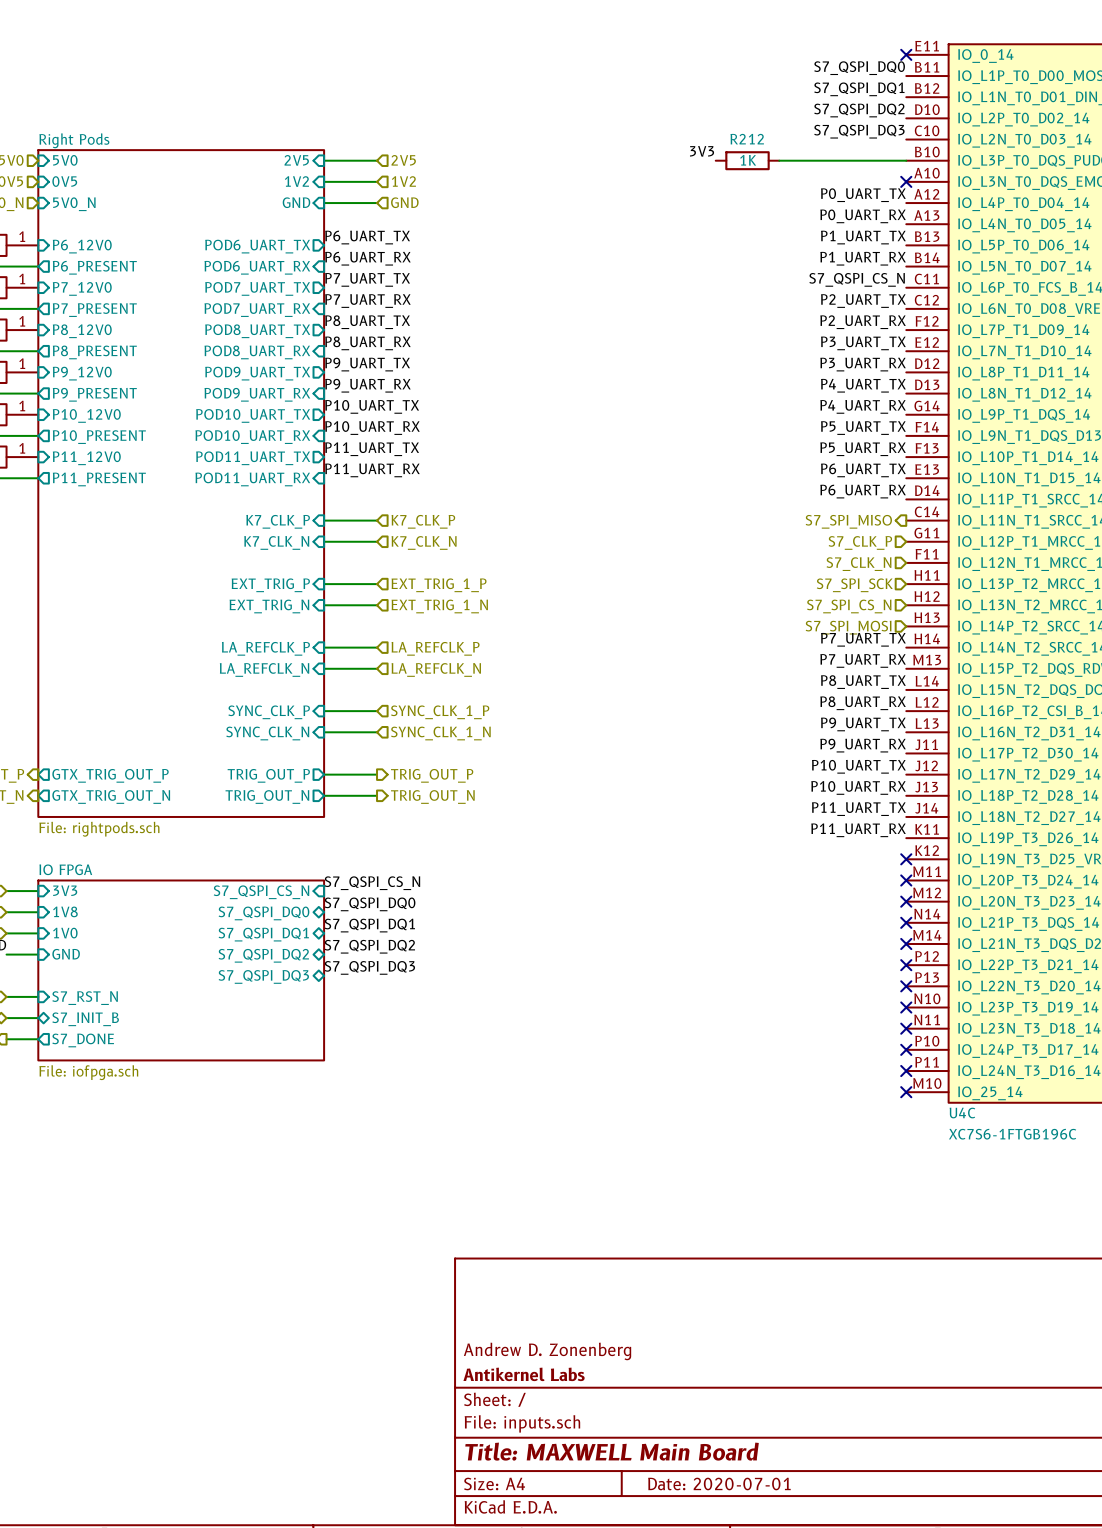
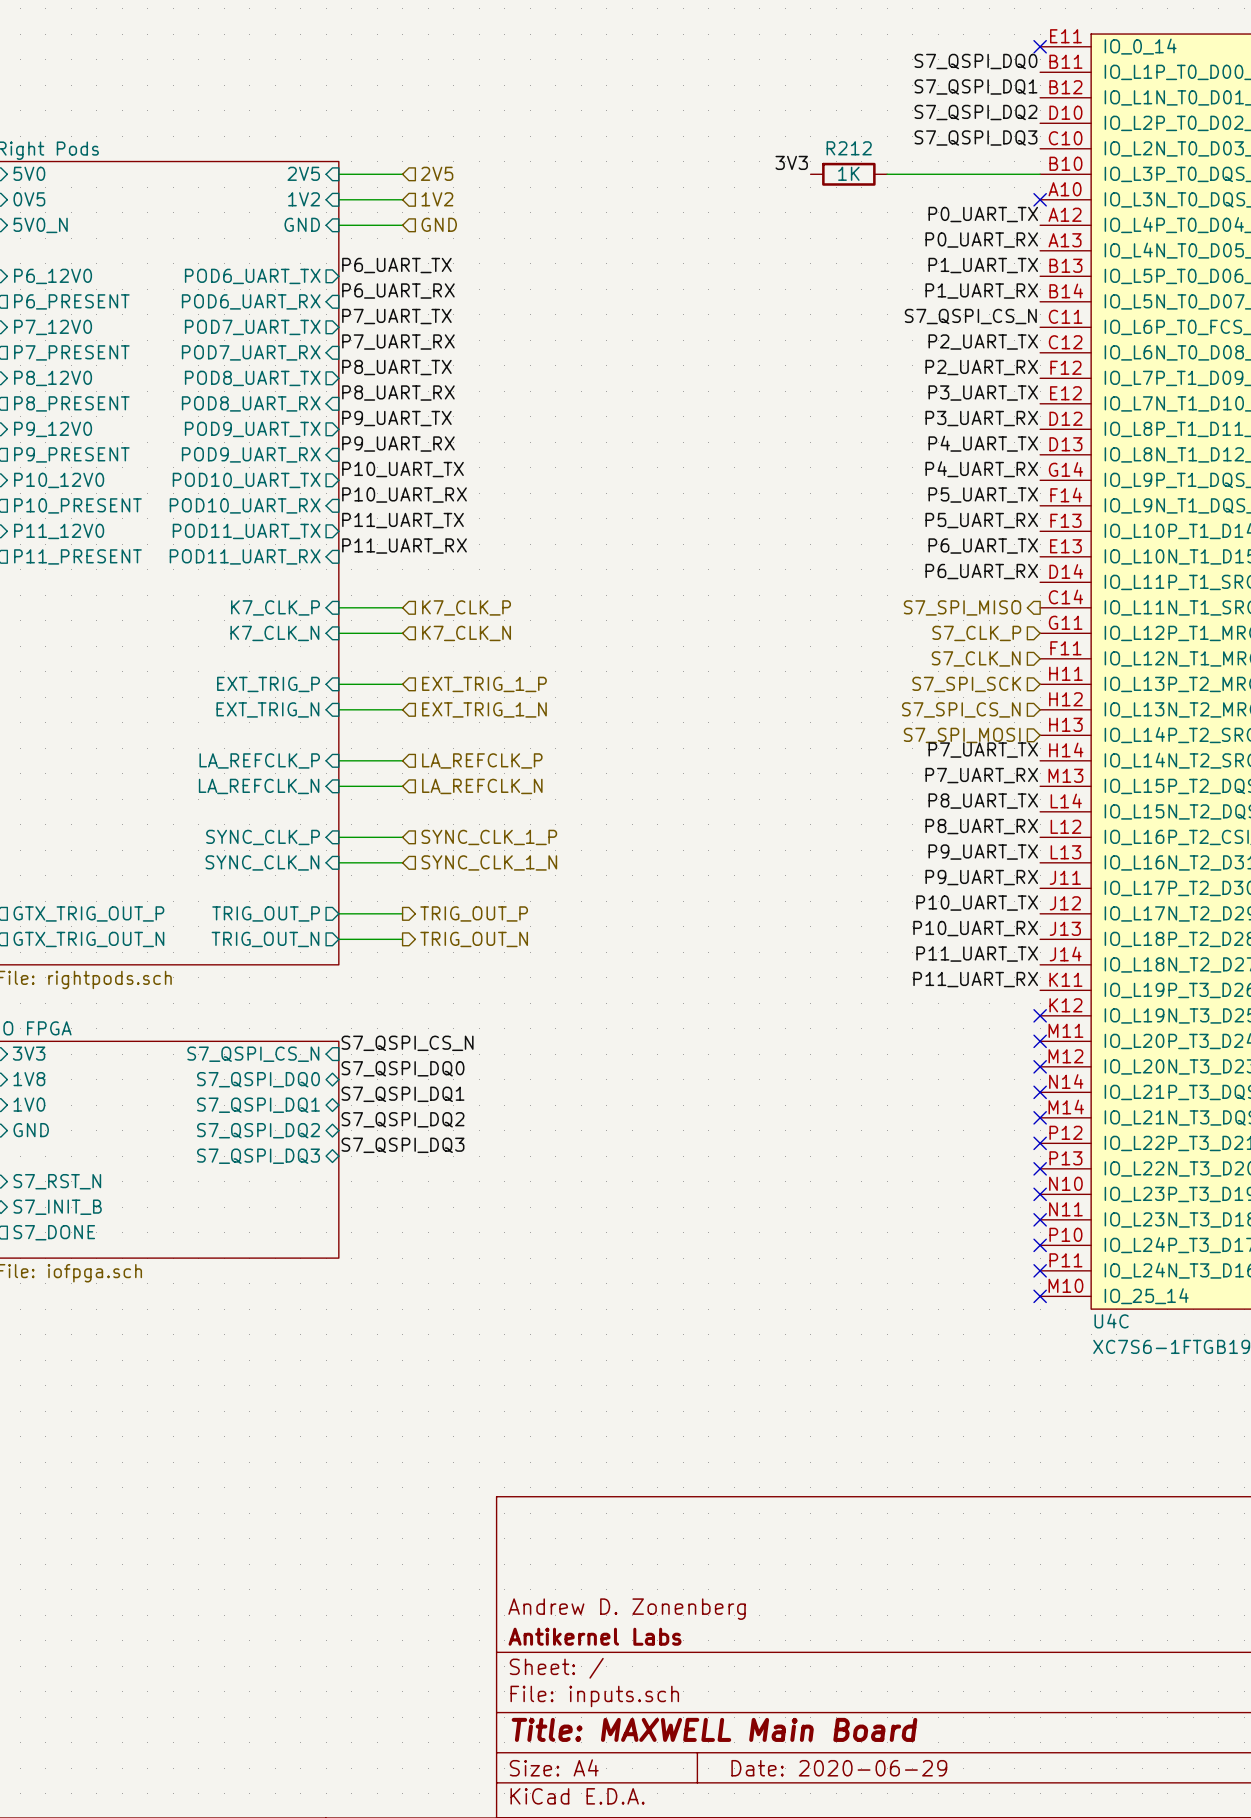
title block: Date: 2020-07-01 (719, 1483) -> Date: 2020-06-29 (839, 1768)

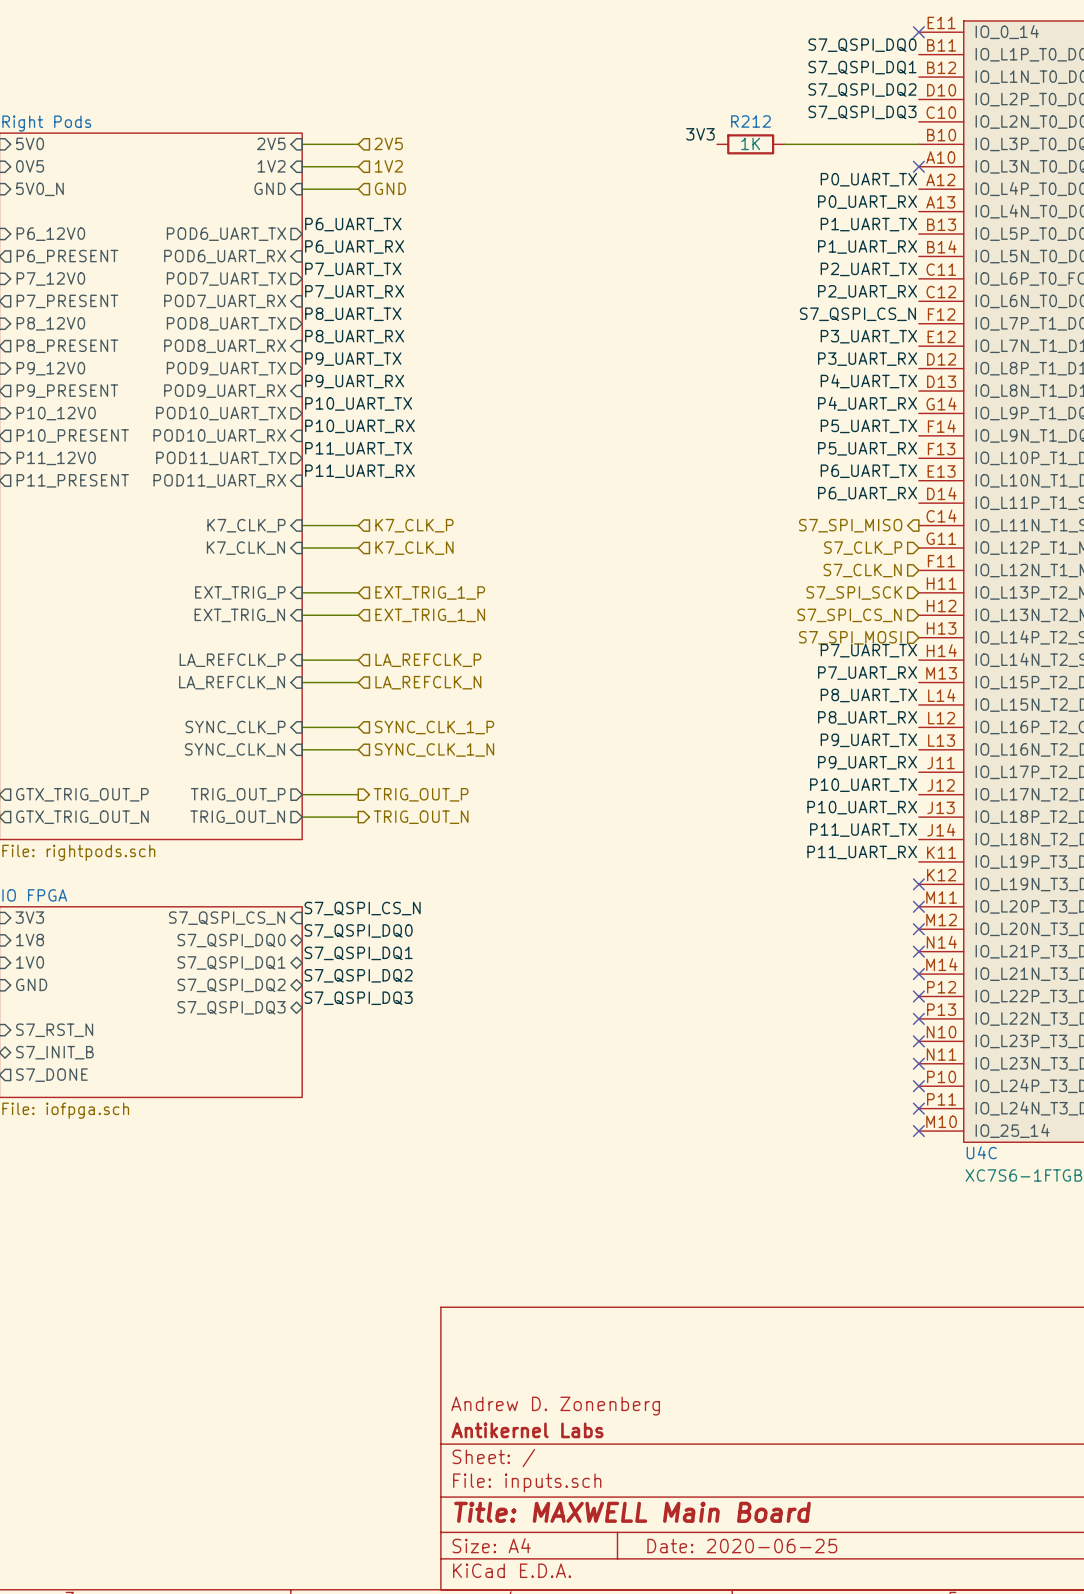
label: S7_QSPI_CS_N (970, 316) -> P2_UART_TX (868, 269)
label: P2_UART_TX (983, 342) -> P2_UART_RX (867, 291)
label: P2_UART_RX (981, 367) -> S7_QSPI_CS_N (857, 314)
title block: Date: 2020-06-29 (839, 1768) -> Date: 2020-06-25 (742, 1546)

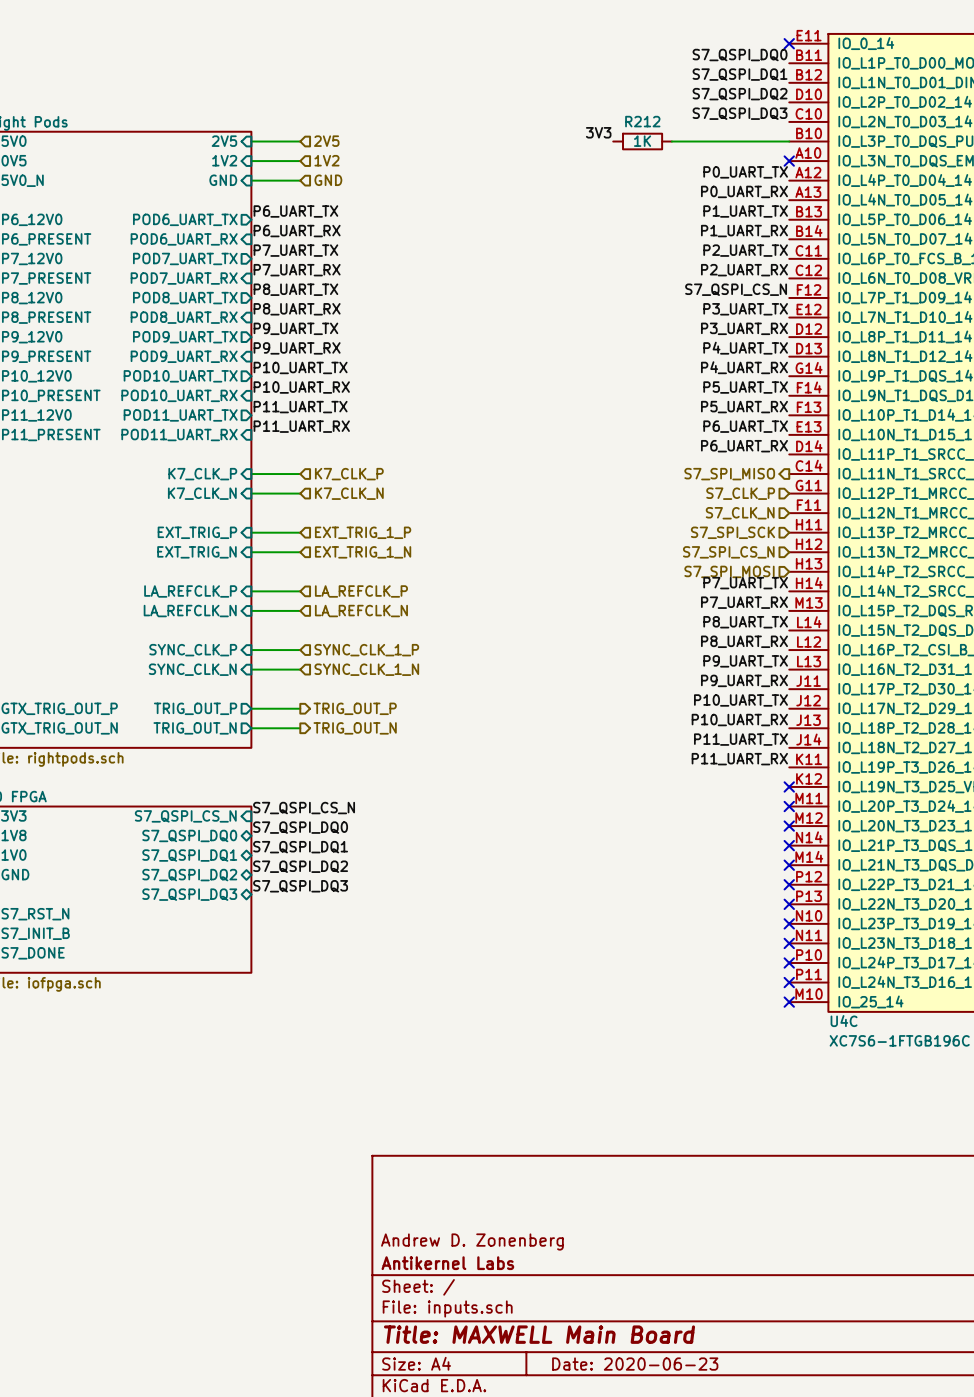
title block: Date: 2020-06-25 (742, 1546) -> Date: 2020-06-23 (635, 1364)

